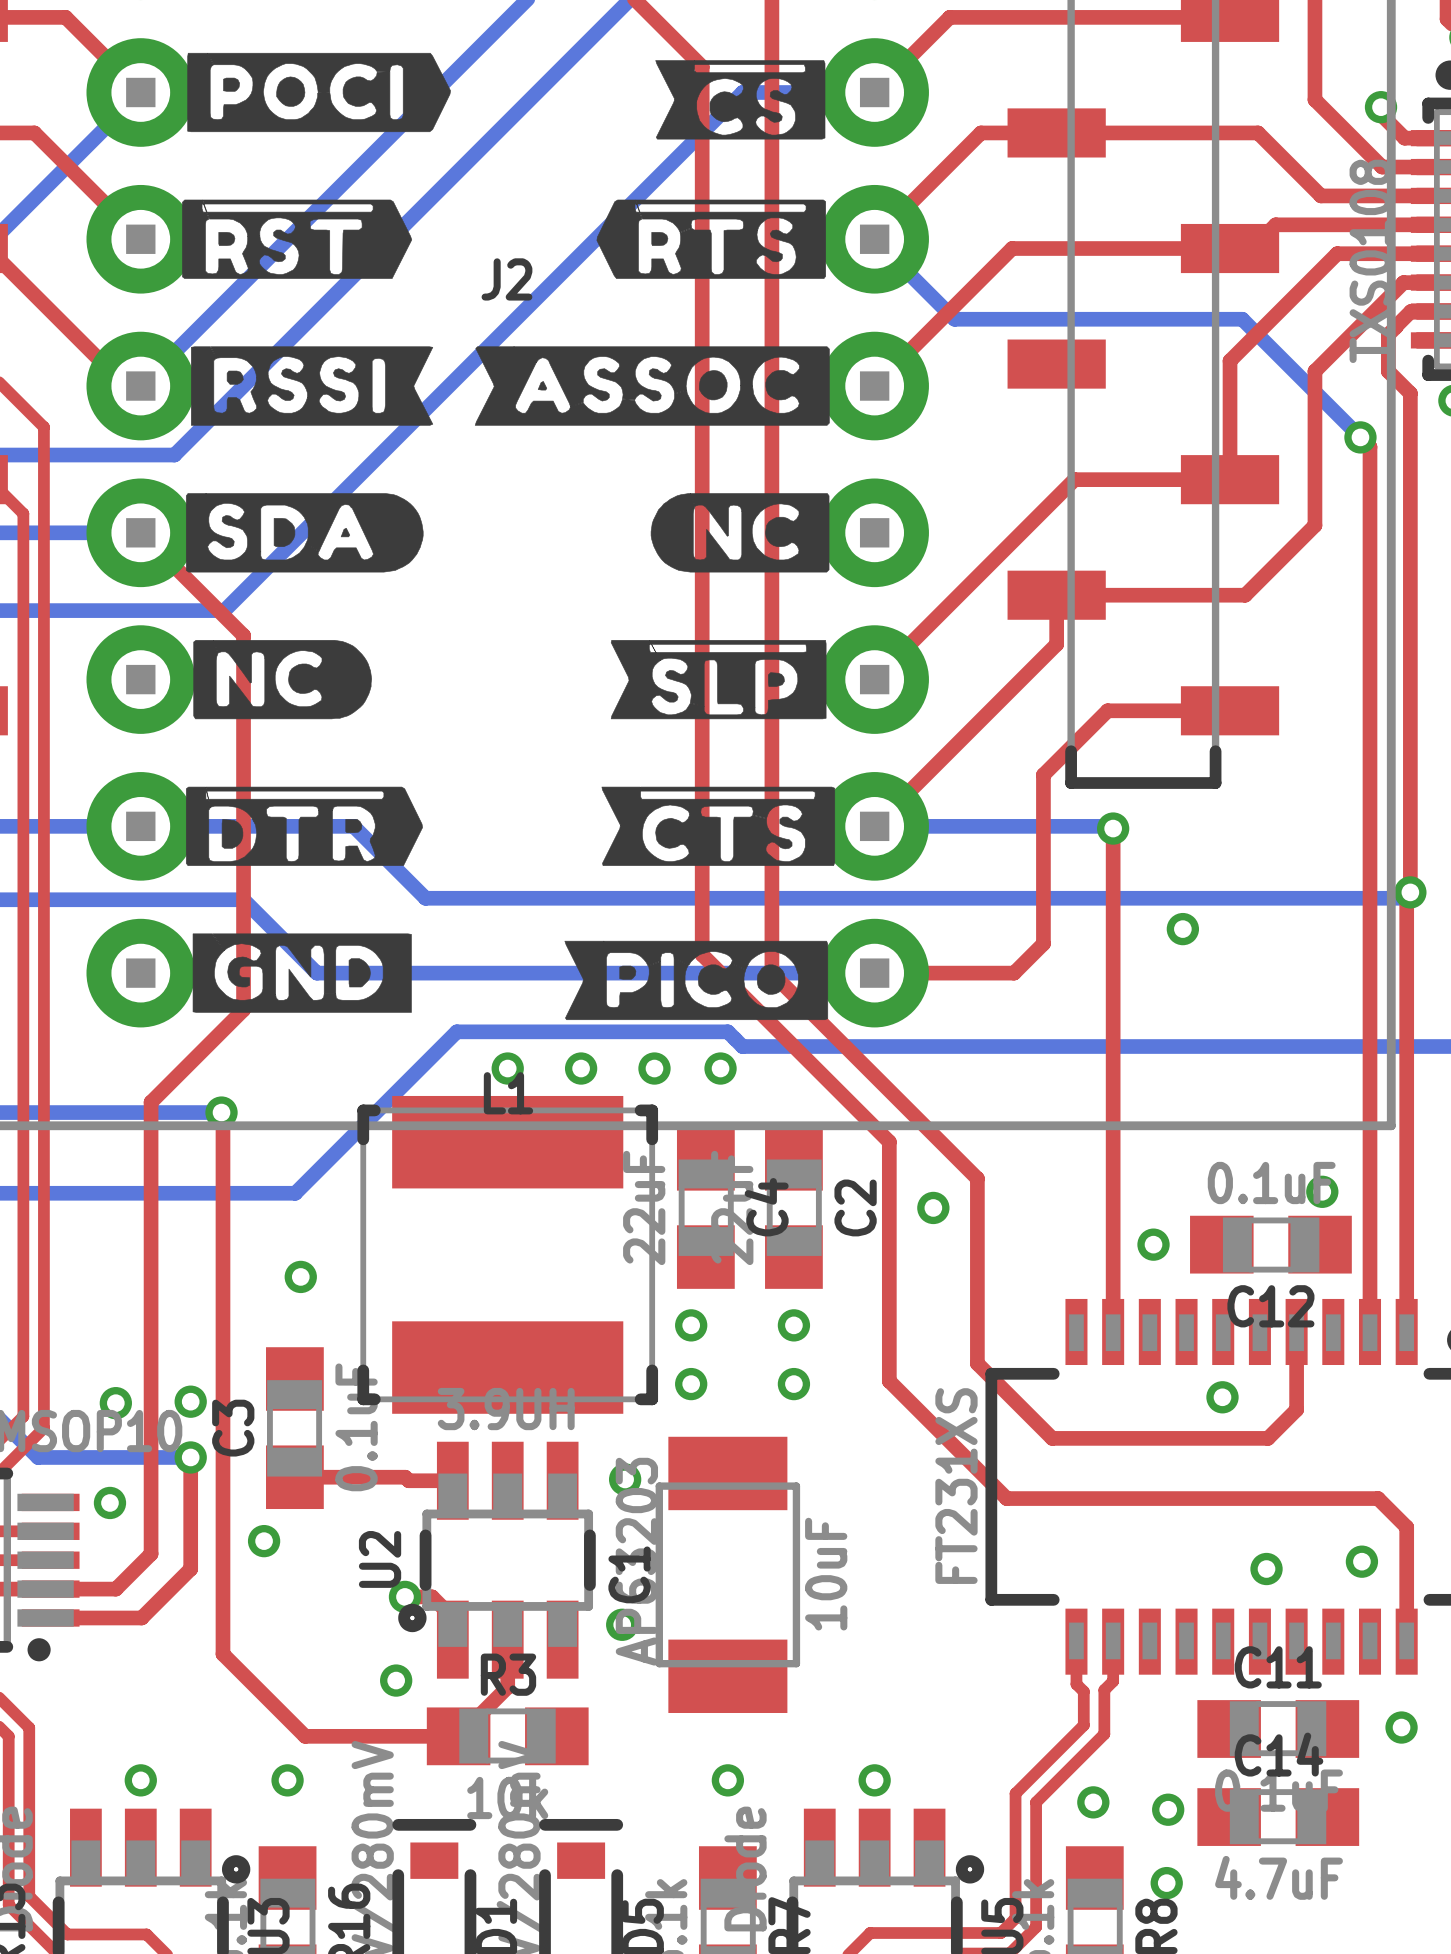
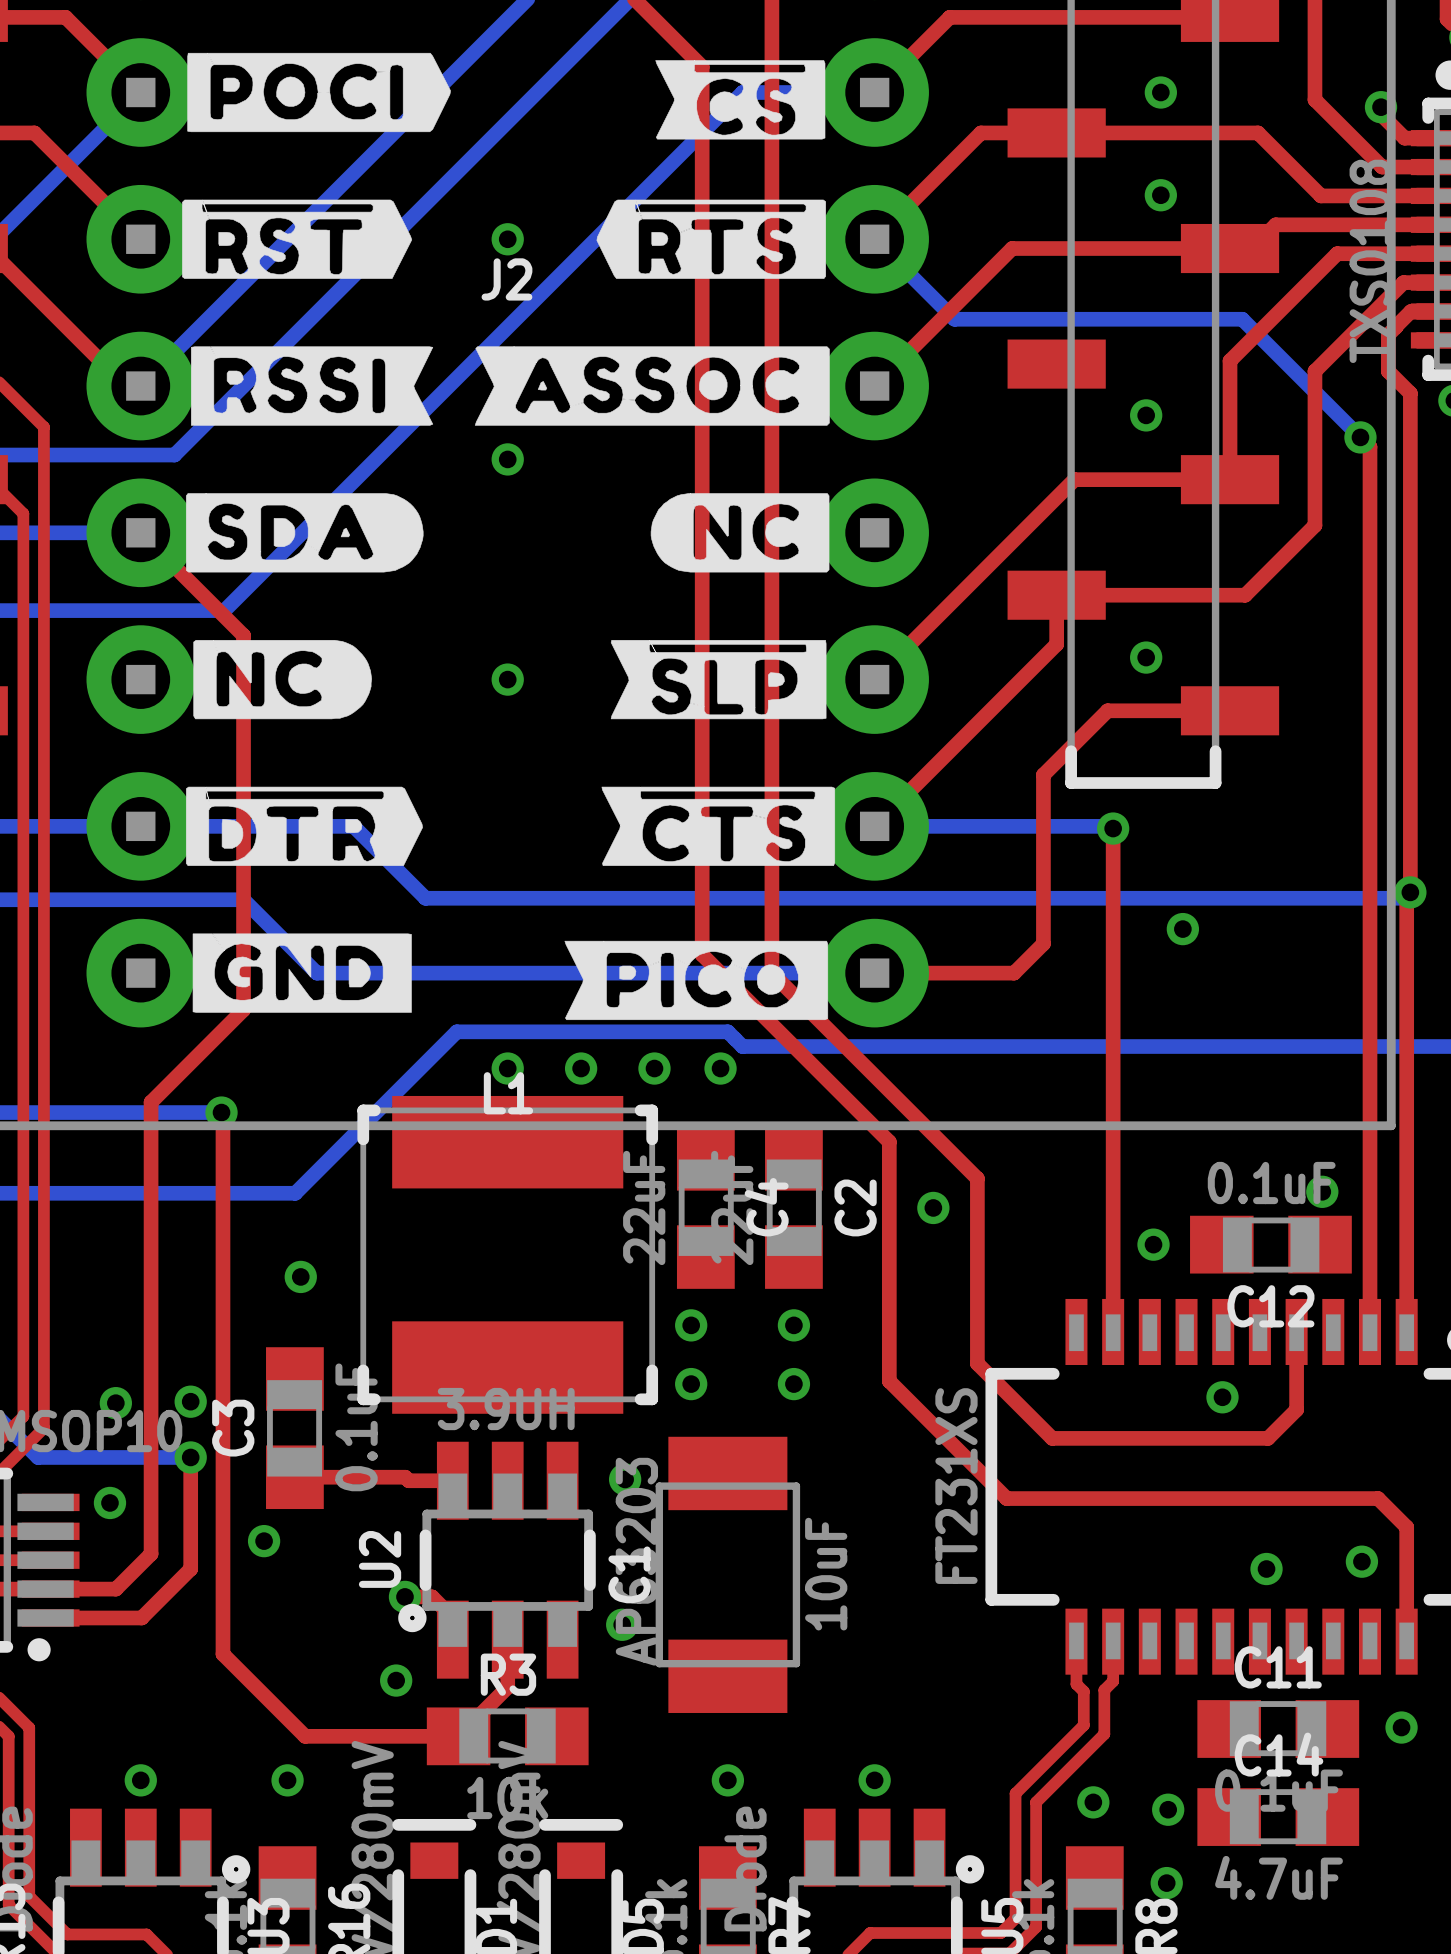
via: none -> (1160, 92)
via: none -> (1160, 195)
via: none -> (507, 239)
via: none -> (1146, 415)
via: none -> (507, 459)
via: none -> (1146, 657)
via: none -> (507, 679)

